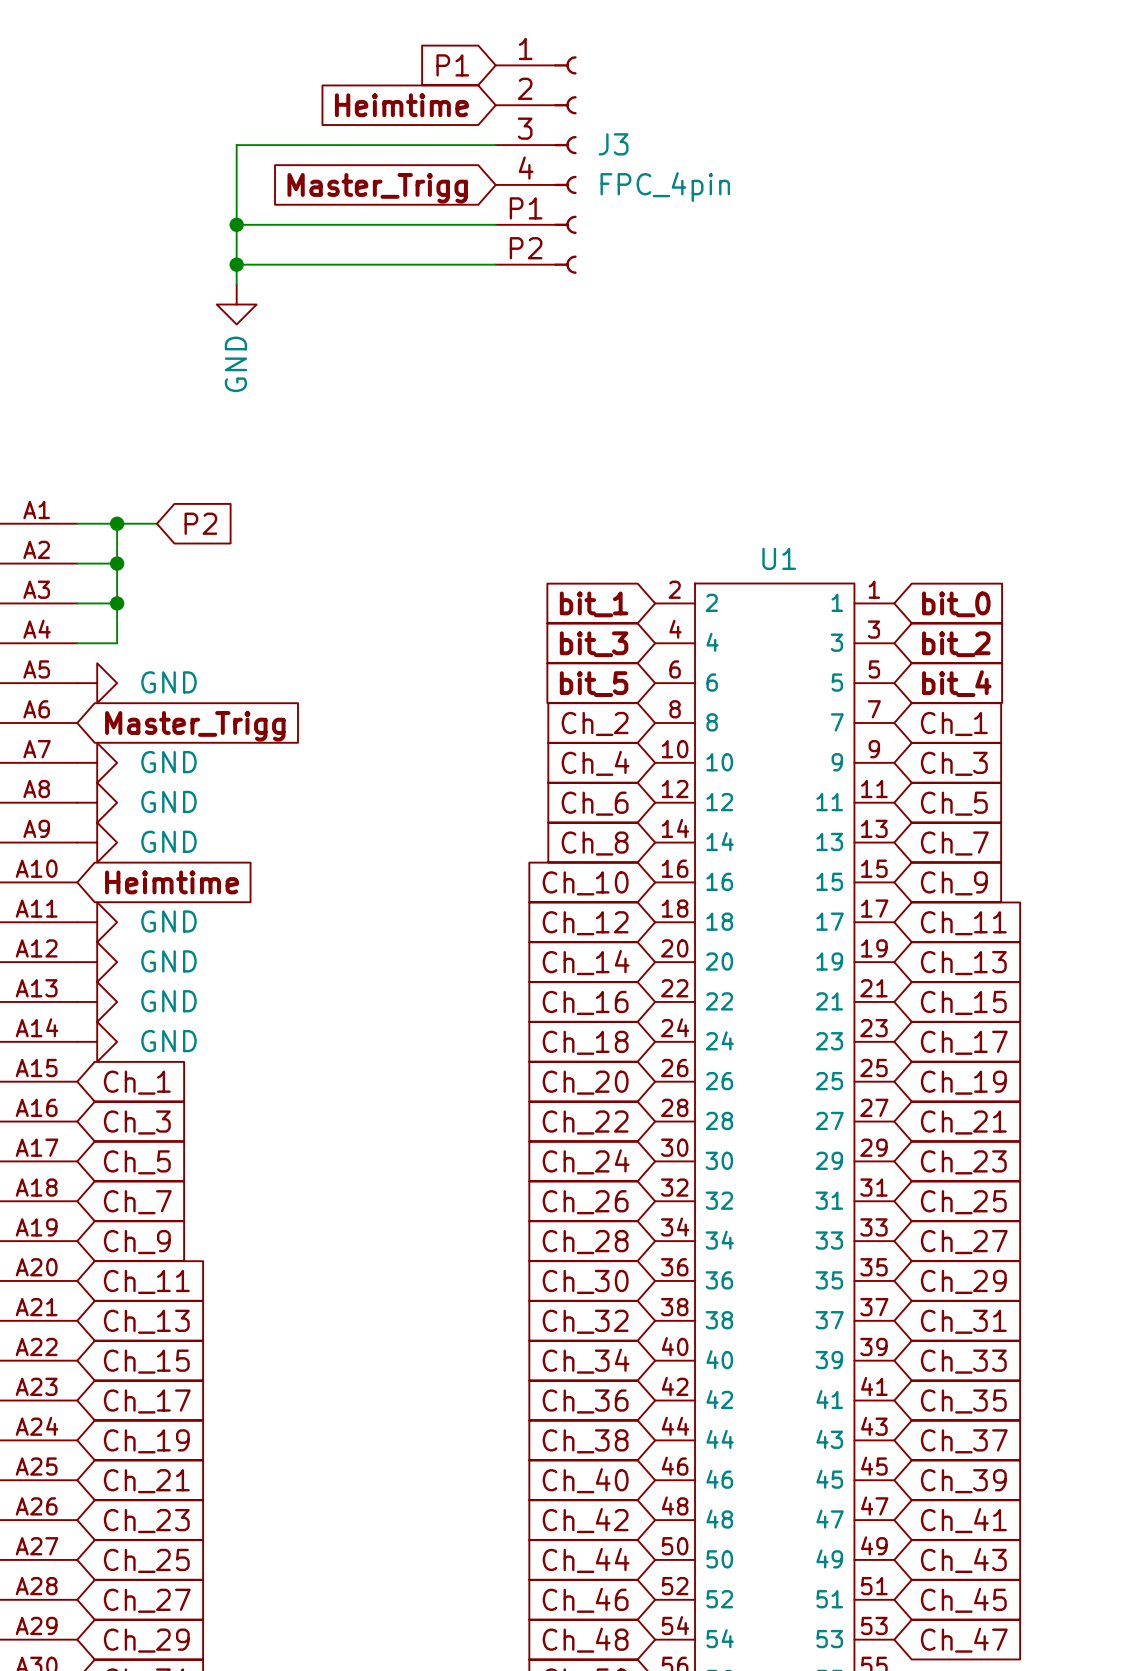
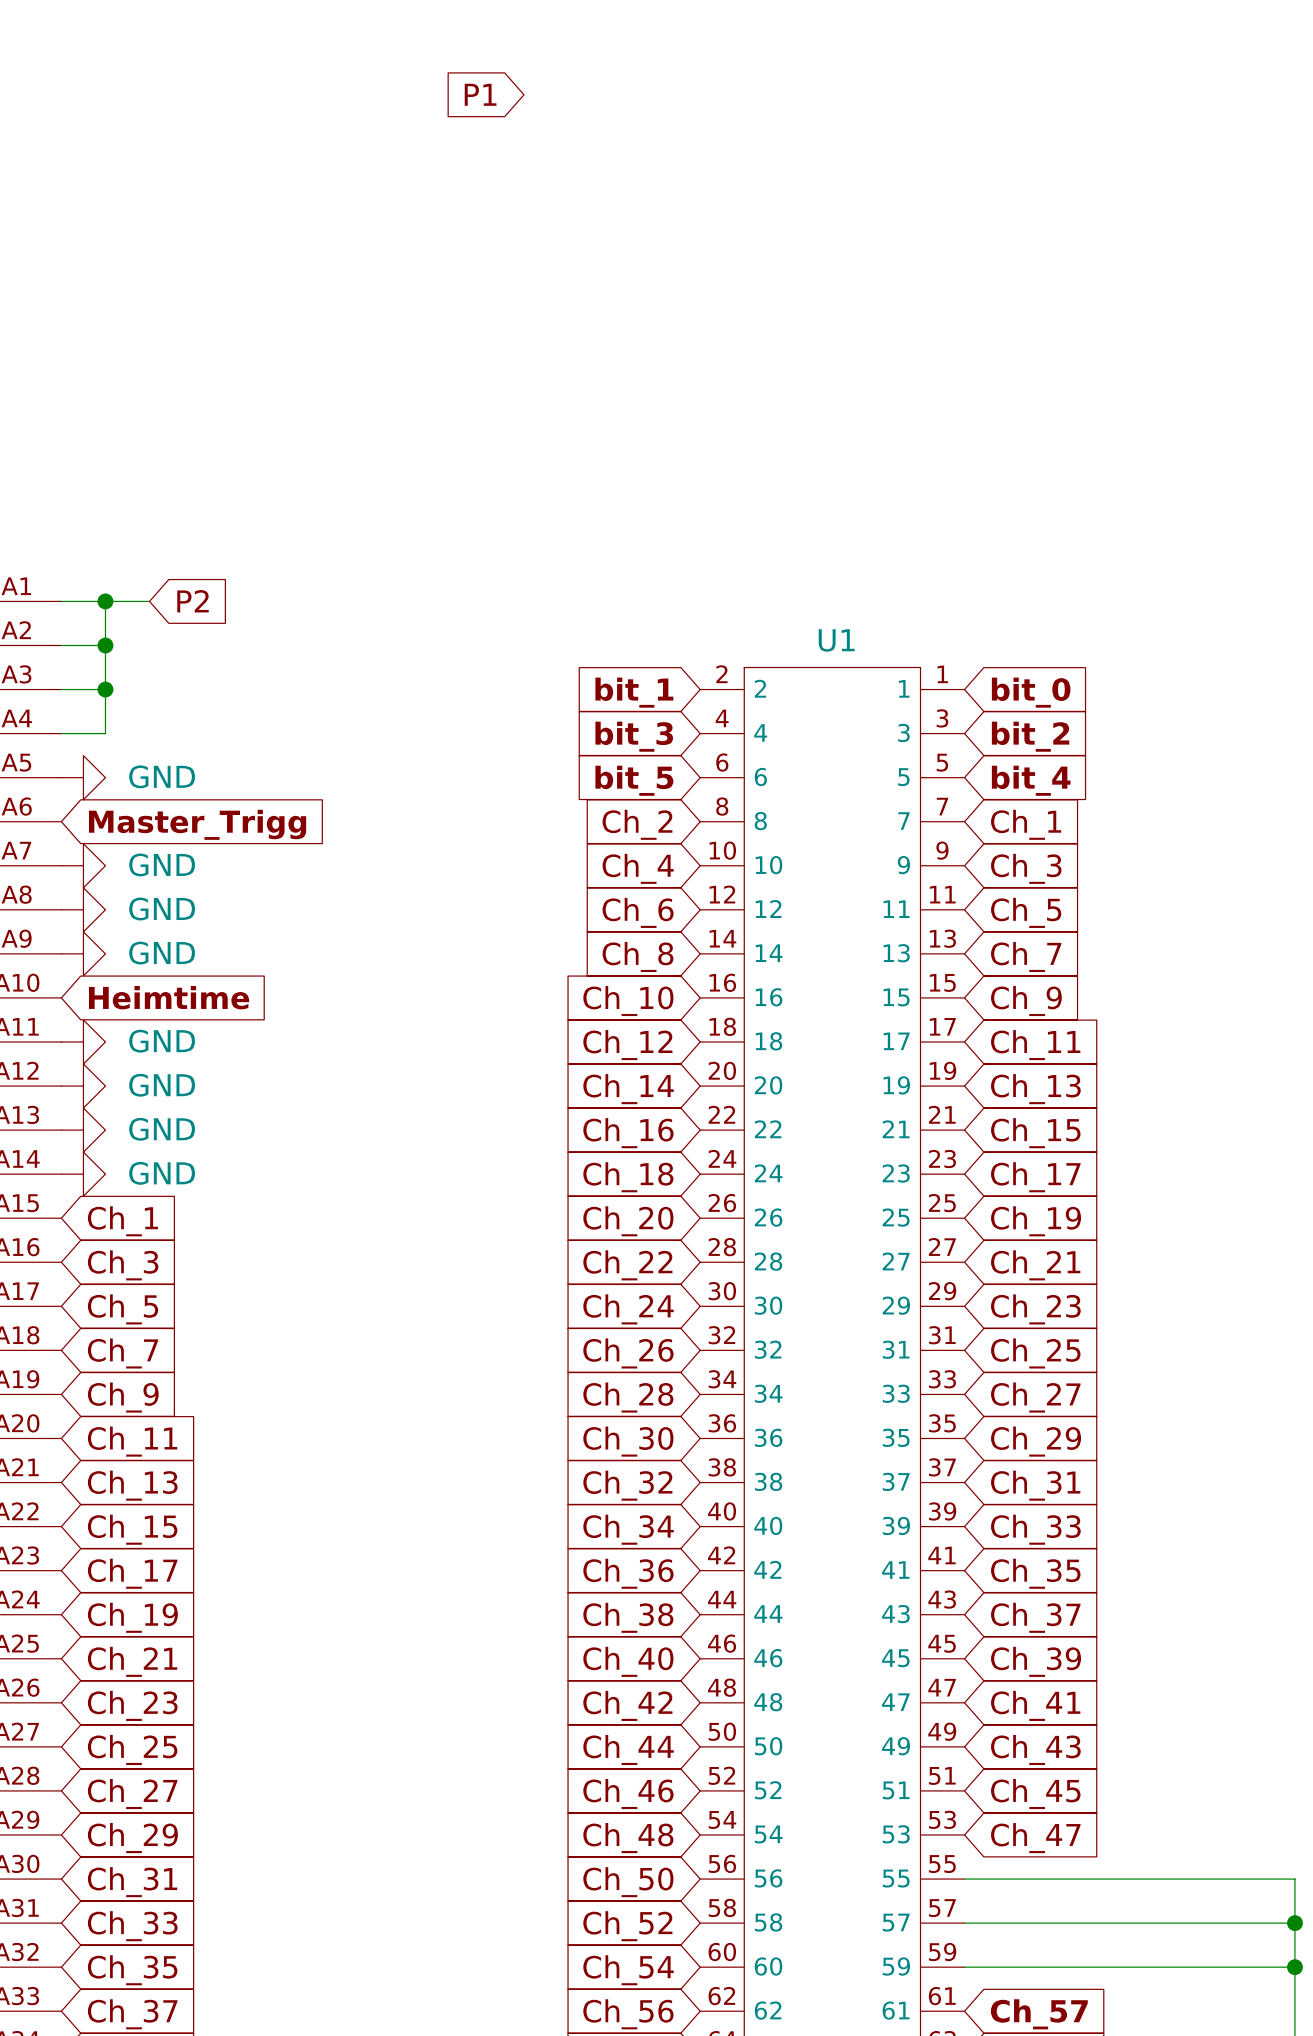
global label: Heimtime (401, 105) -> none
wire: (495, 145) (236, 145) (236, 284) -> none
J3: FPC_4pin (536, 165) -> none
global label: Master_Trigg (377, 188) -> none
wire: (236, 224) (495, 224) -> none
junction: (236, 224) -> none
wire: (236, 264) (495, 264) -> none
junction: (236, 264) -> none
power symbol: GND (236, 304) -> none

